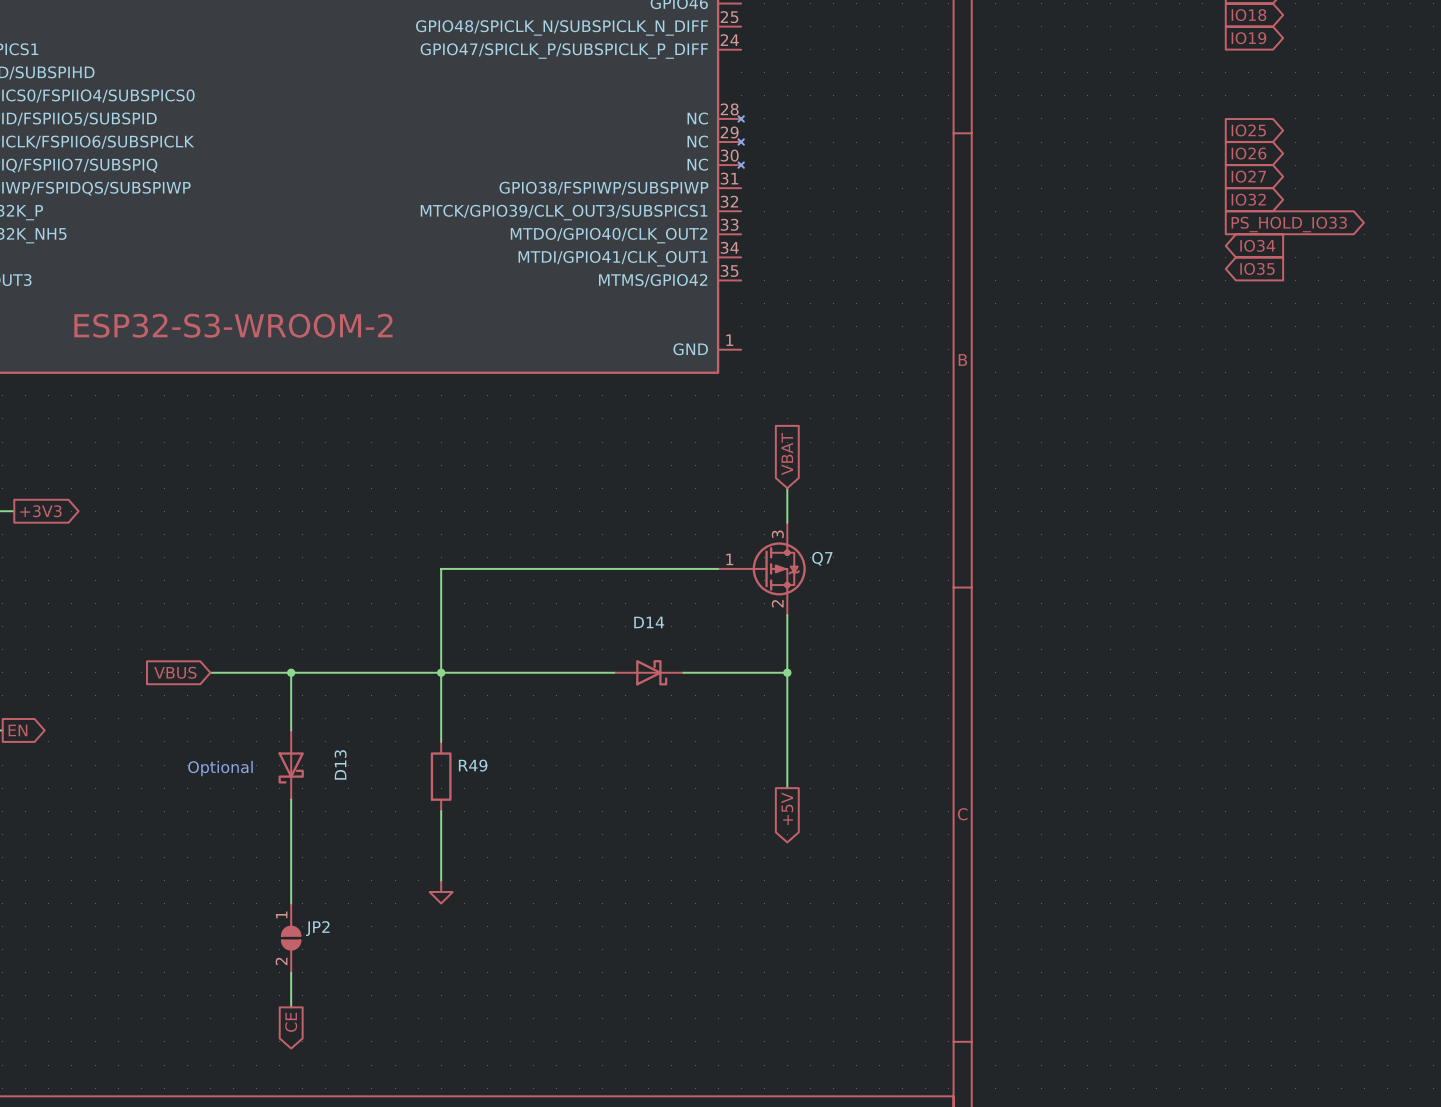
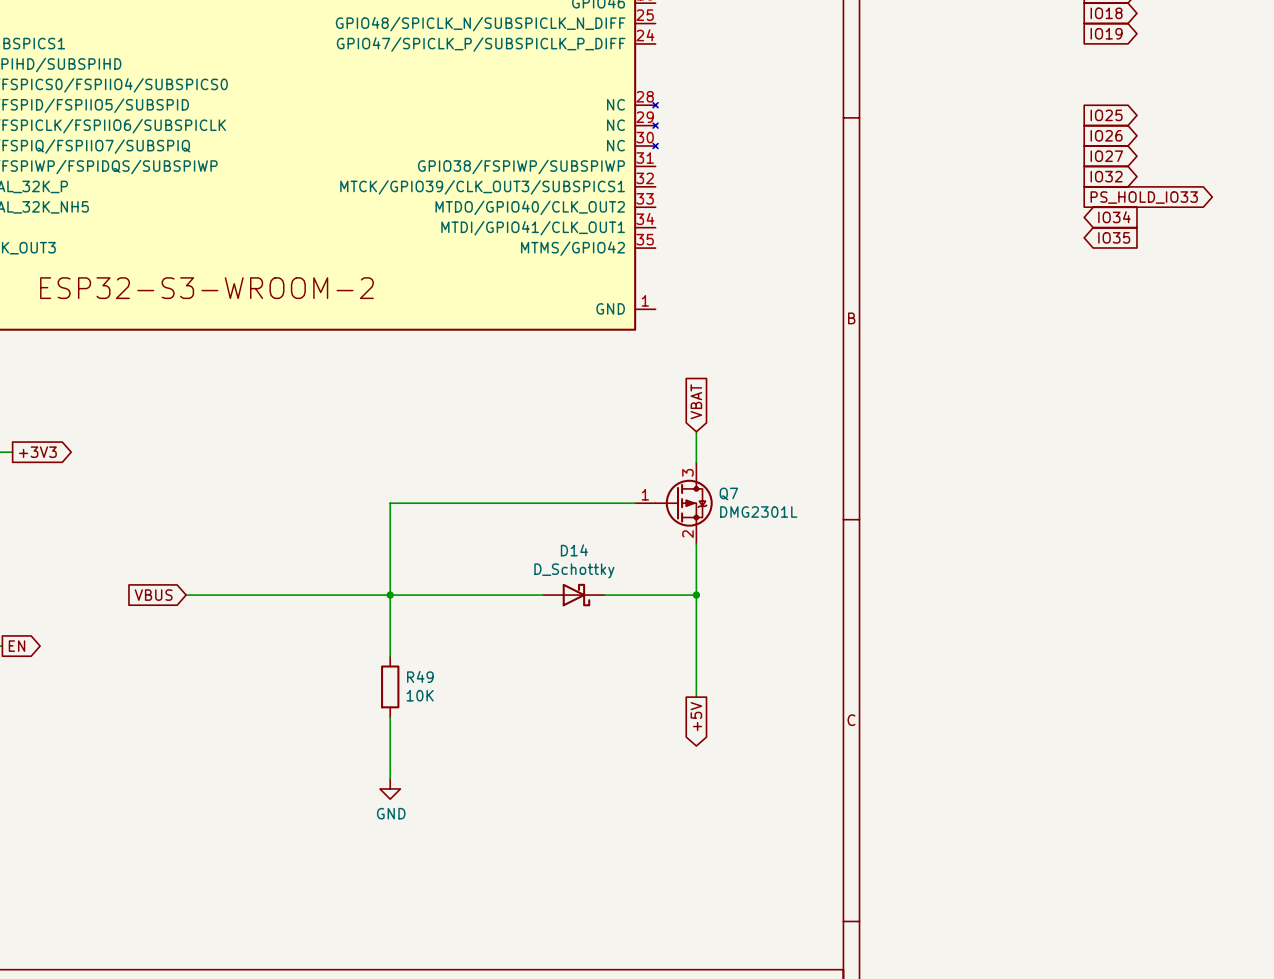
Q7 value: none -> DMG2301L (758, 512)
D14 value: none -> D_Schottky (574, 570)
wire: (291, 672) (291, 730) -> none
junction: (291, 672) -> none
D13: (291, 765) -> none
text: Optional (220, 768) -> none
R49 value: none -> 10K (420, 695)
wire: (291, 799) (291, 903) -> none
power symbol text: none -> GND (391, 813)
JP2: (291, 938) -> none
wire: (291, 972) (291, 1007) -> none
global label: CE (291, 1022) -> none

